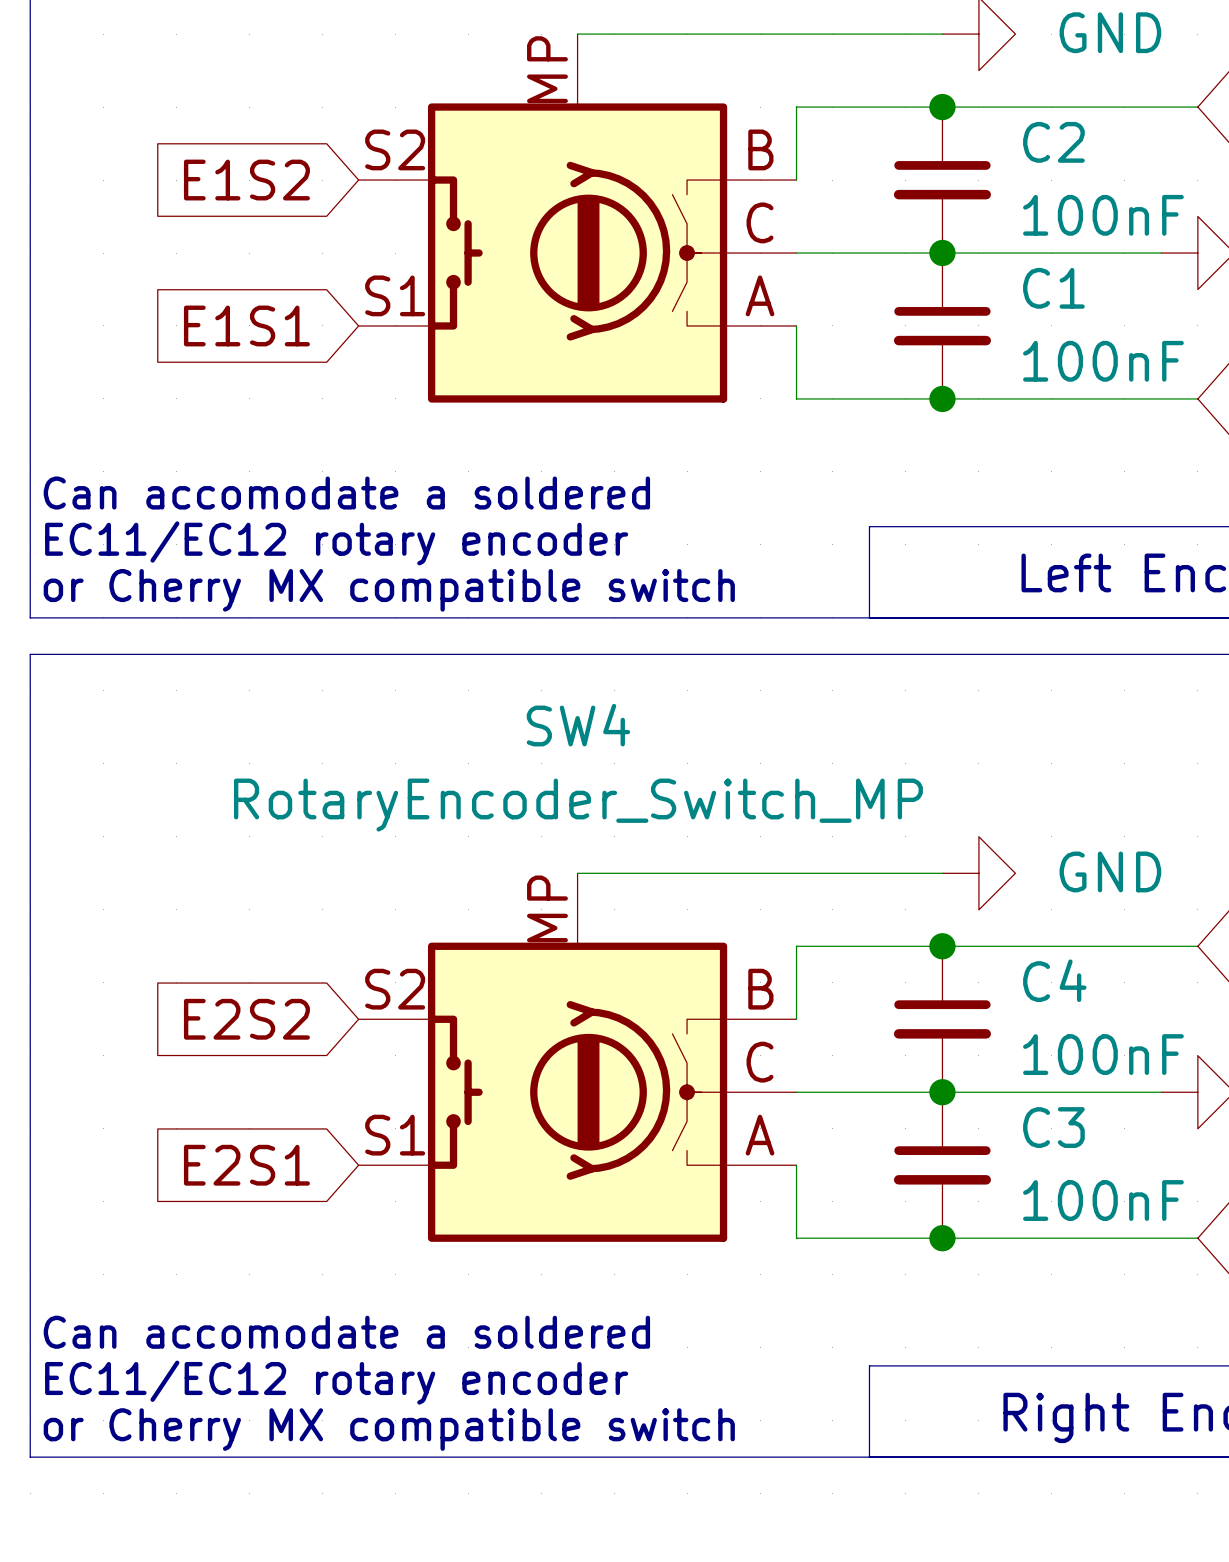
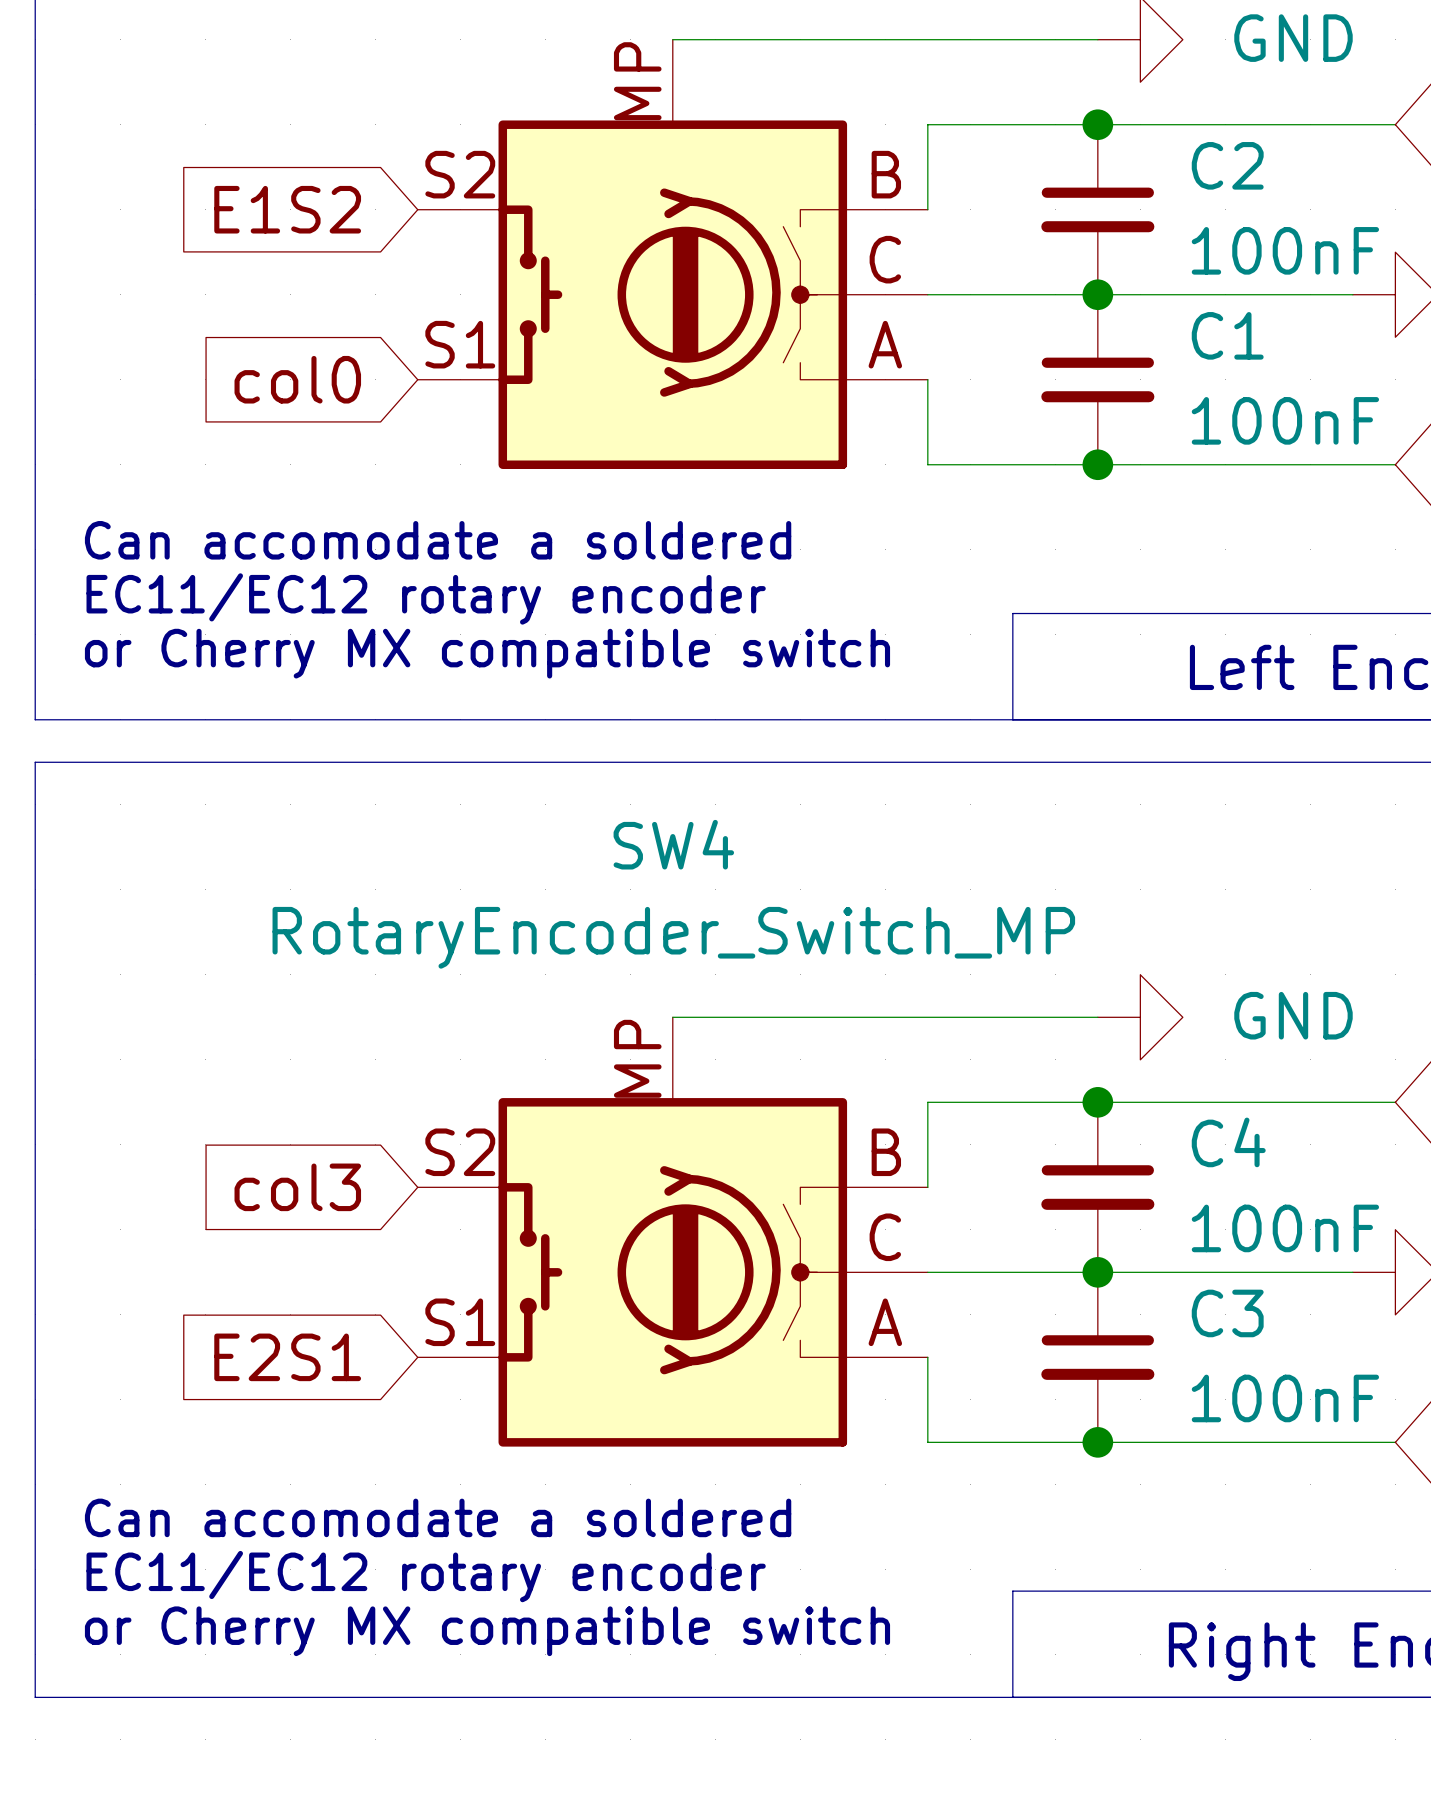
global label: E1S1 (246, 325) -> col0 (297, 379)
text position: Can accomodate a soldered (346, 493) -> Can accomodate a soldered (438, 540)
text position: EC11/EC12 rotary encoder (336, 543) -> EC11/EC12 rotary encoder (426, 598)
text position: or Cherry MX compatible switch (389, 590) -> or Cherry MX compatible switch (487, 653)
global label: E2S2 (246, 1019) -> col3 (297, 1187)
text position: Can accomodate a soldered (346, 1332) -> Can accomodate a soldered (438, 1517)
text position: EC11/EC12 rotary encoder (336, 1382) -> EC11/EC12 rotary encoder (426, 1576)
text position: or Cherry MX compatible switch (389, 1429) -> or Cherry MX compatible switch (487, 1631)

